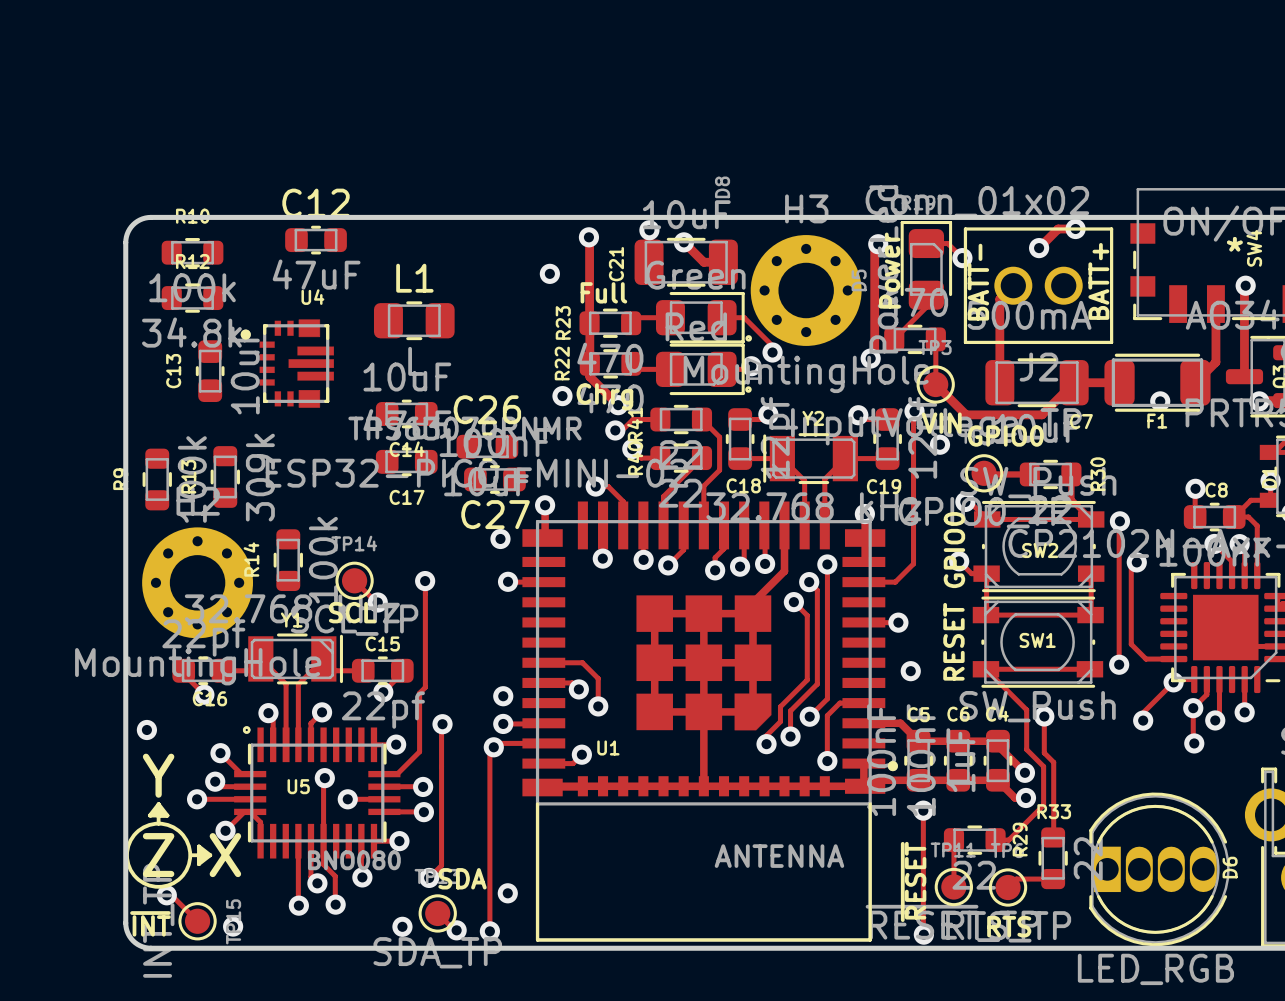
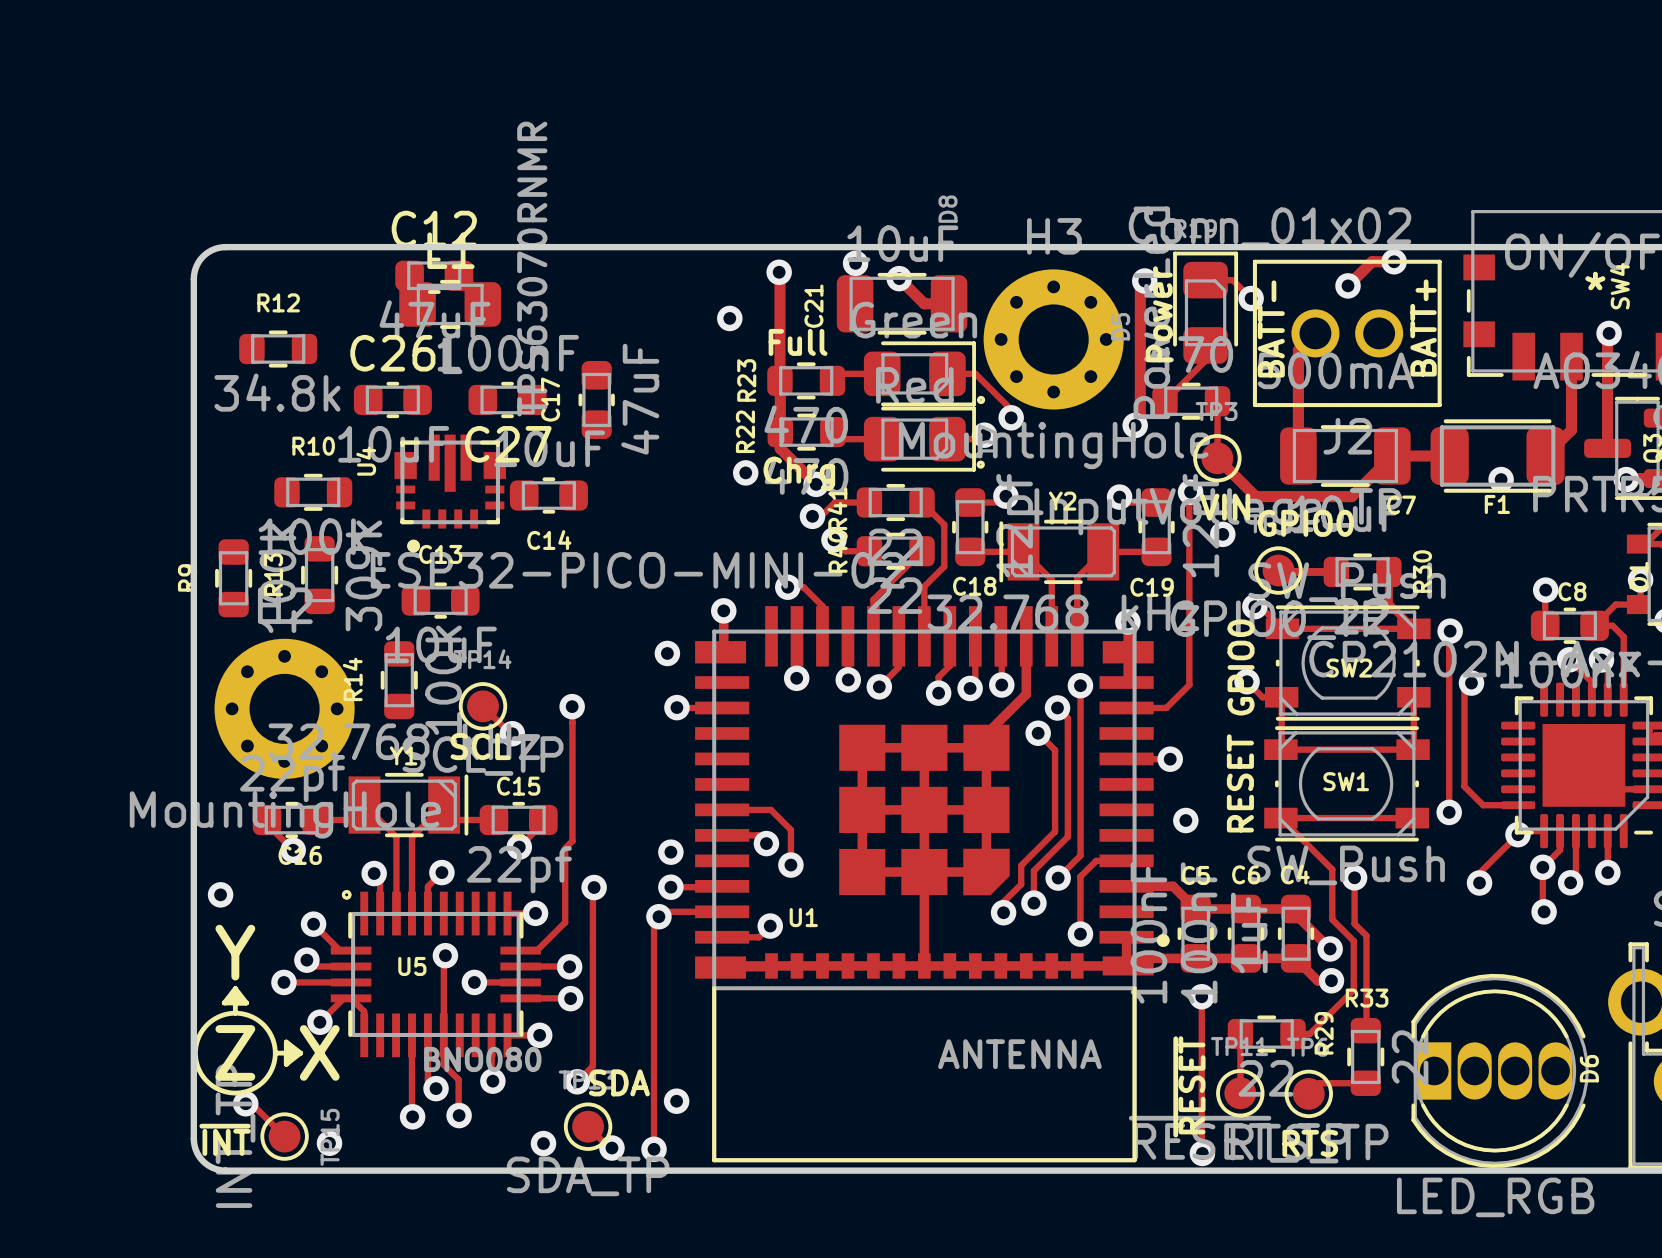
R10 position: (192, 252) -> (313, 492)
L1 position: (414, 320) -> (450, 304)
U4 rotation: 0° (287, 363) -> 90° counterclockwise (450, 493)
U4 position: (287, 363) -> (450, 493)
C13 rotation: 0° (210, 371) -> 90° clockwise (440, 600)
C13 position: (210, 371) -> (440, 600)
C26 position: (487, 446) -> (392, 399)
C17 rotation: 0° (406, 461) -> 90° clockwise (596, 399)
C17 position: (406, 461) -> (596, 399)
C27 position: (494, 479) -> (507, 399)

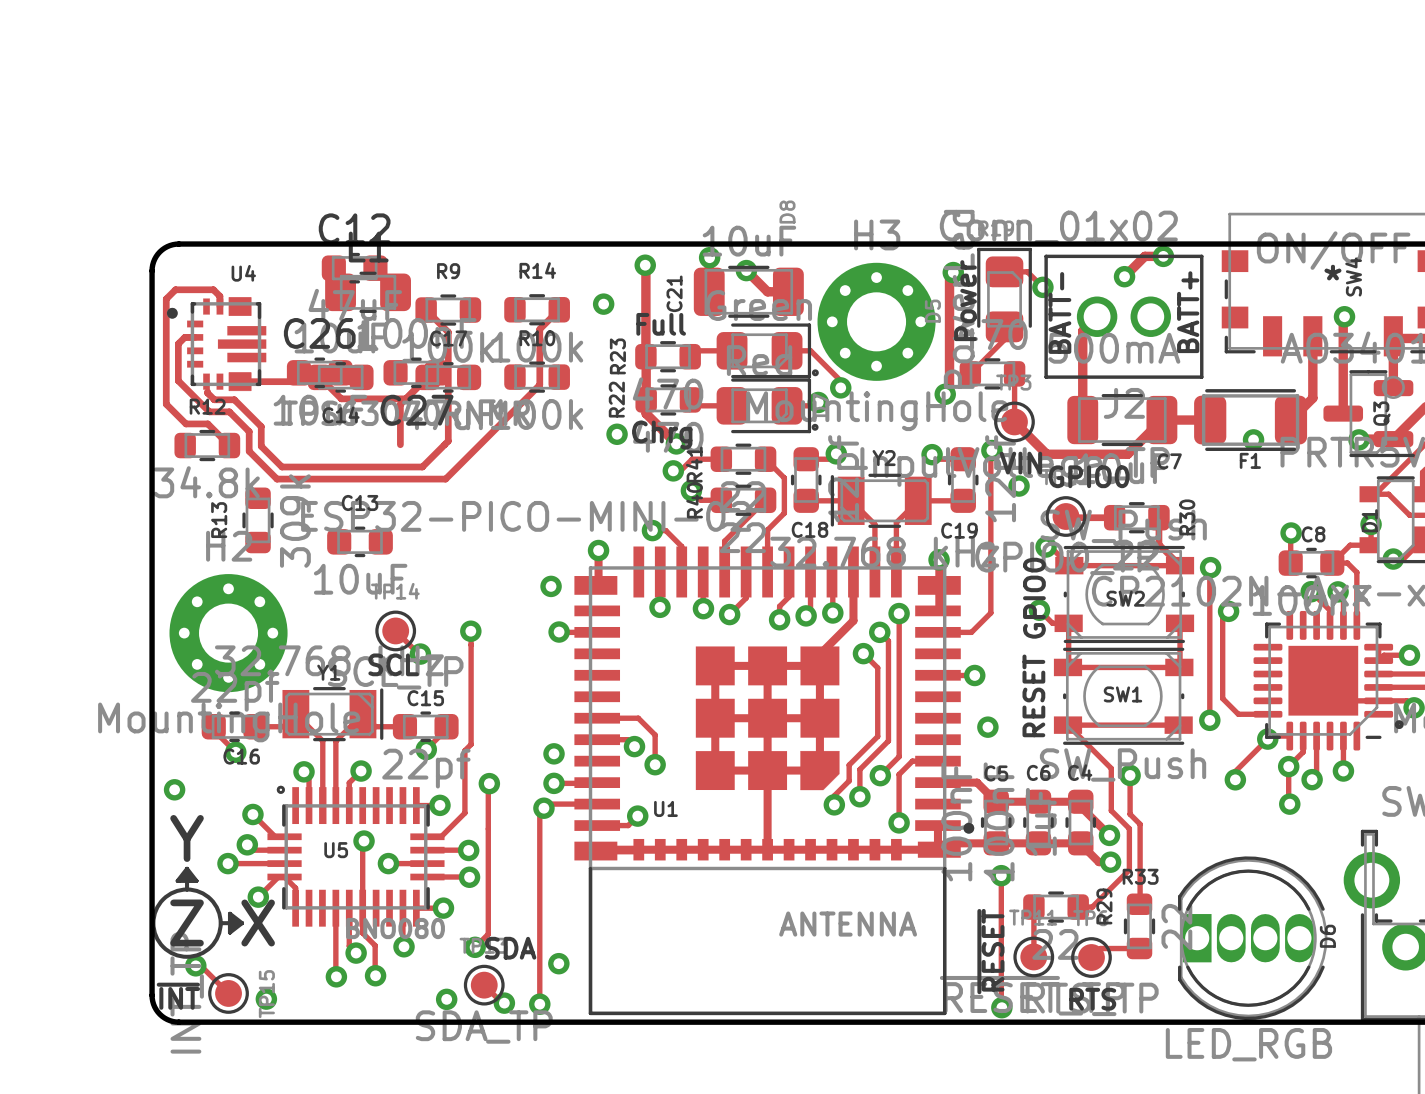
track: none -> (219, 306) (219, 296) (213, 289) (175, 289) (166, 299) (166, 404) (185, 423) (207, 423) (229, 445)
track: none -> (426, 310) (448, 332) (448, 441) (422, 467) (281, 467) (261, 446) (261, 426) (234, 399) (214, 399) (207, 391)
track: none -> (559, 309) (539, 329) (539, 384) (445, 479) (276, 479) (249, 451) (249, 431) (229, 411) (209, 411) (178, 380) (178, 343) (184, 337) (195, 337)
R12 position: (278, 349) -> (207, 445)
C17 rotation: 0° (596, 399) -> 90° clockwise (448, 377)
C17 position: (596, 399) -> (448, 377)
track: none -> (427, 377) (400, 404) (400, 444)
track: none -> (240, 381) (315, 381) (319, 377) (341, 398) (406, 398)
R10 position: (313, 492) -> (537, 377)
U4 rotation: 0° (450, 493) -> 90° clockwise (216, 344)
U4 position: (450, 493) -> (216, 344)
C14 position: (548, 495) -> (340, 377)
R9 rotation: 0° (233, 578) -> 90° clockwise (448, 310)
R9 position: (233, 578) -> (448, 310)
R14 rotation: 0° (399, 680) -> 90° clockwise (537, 309)
R14 position: (399, 680) -> (537, 309)

